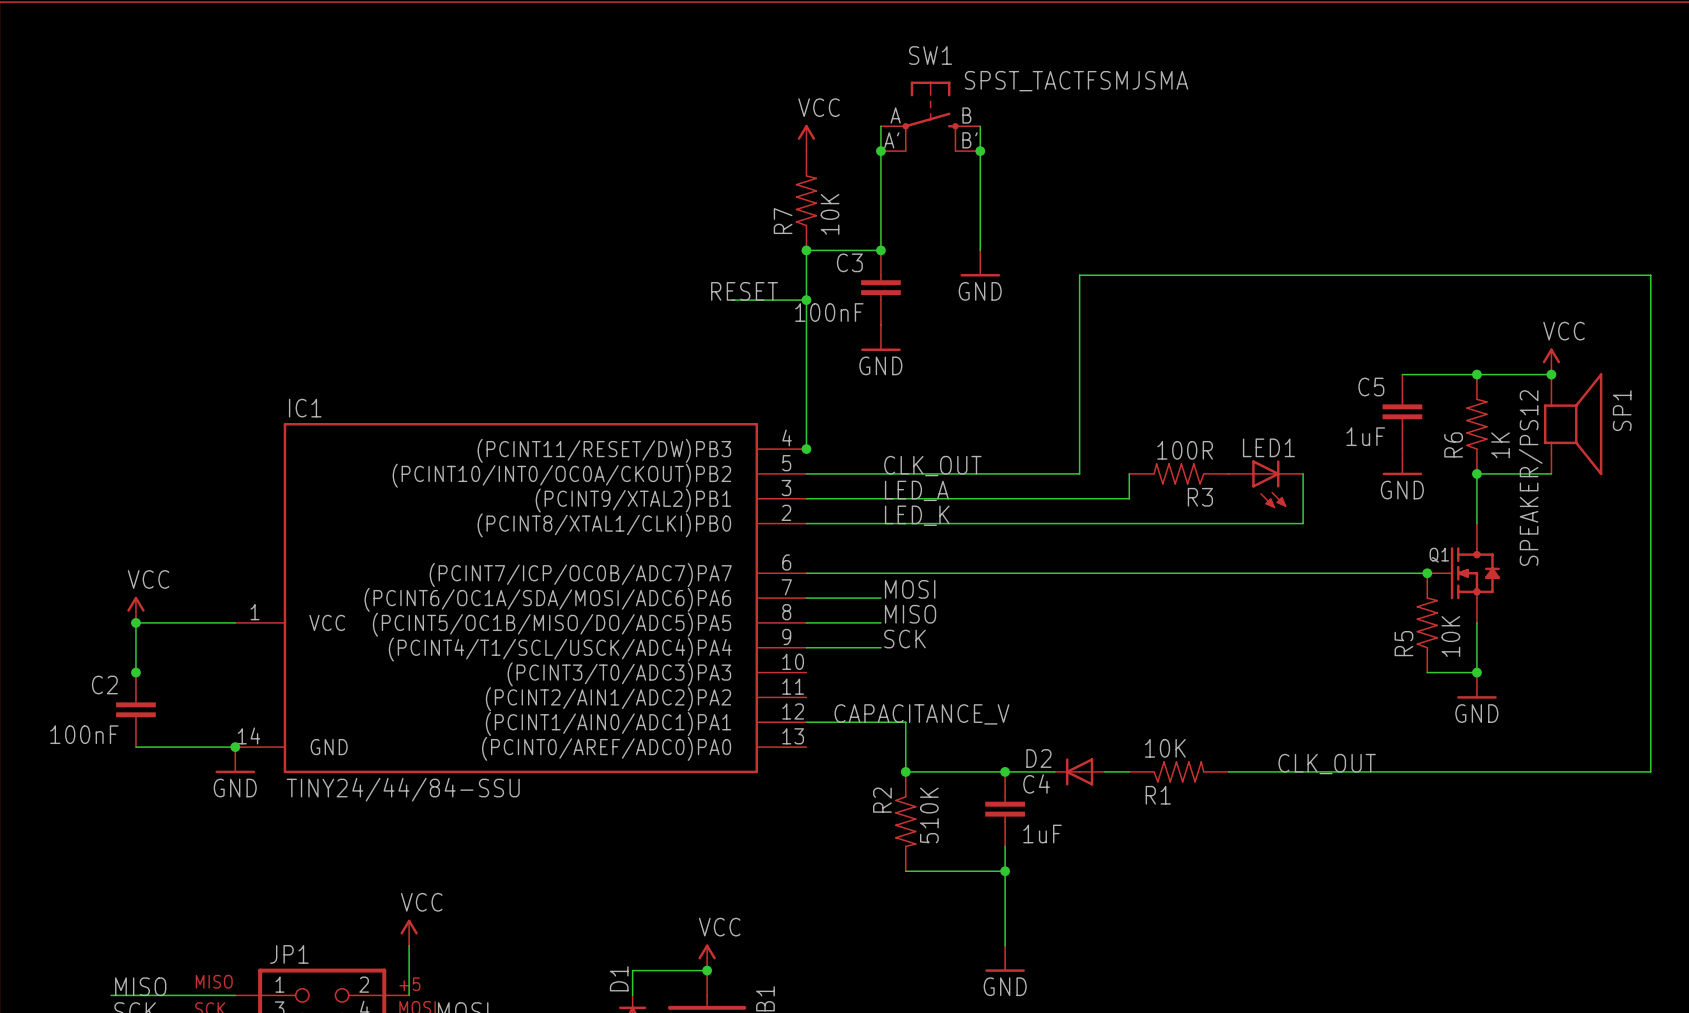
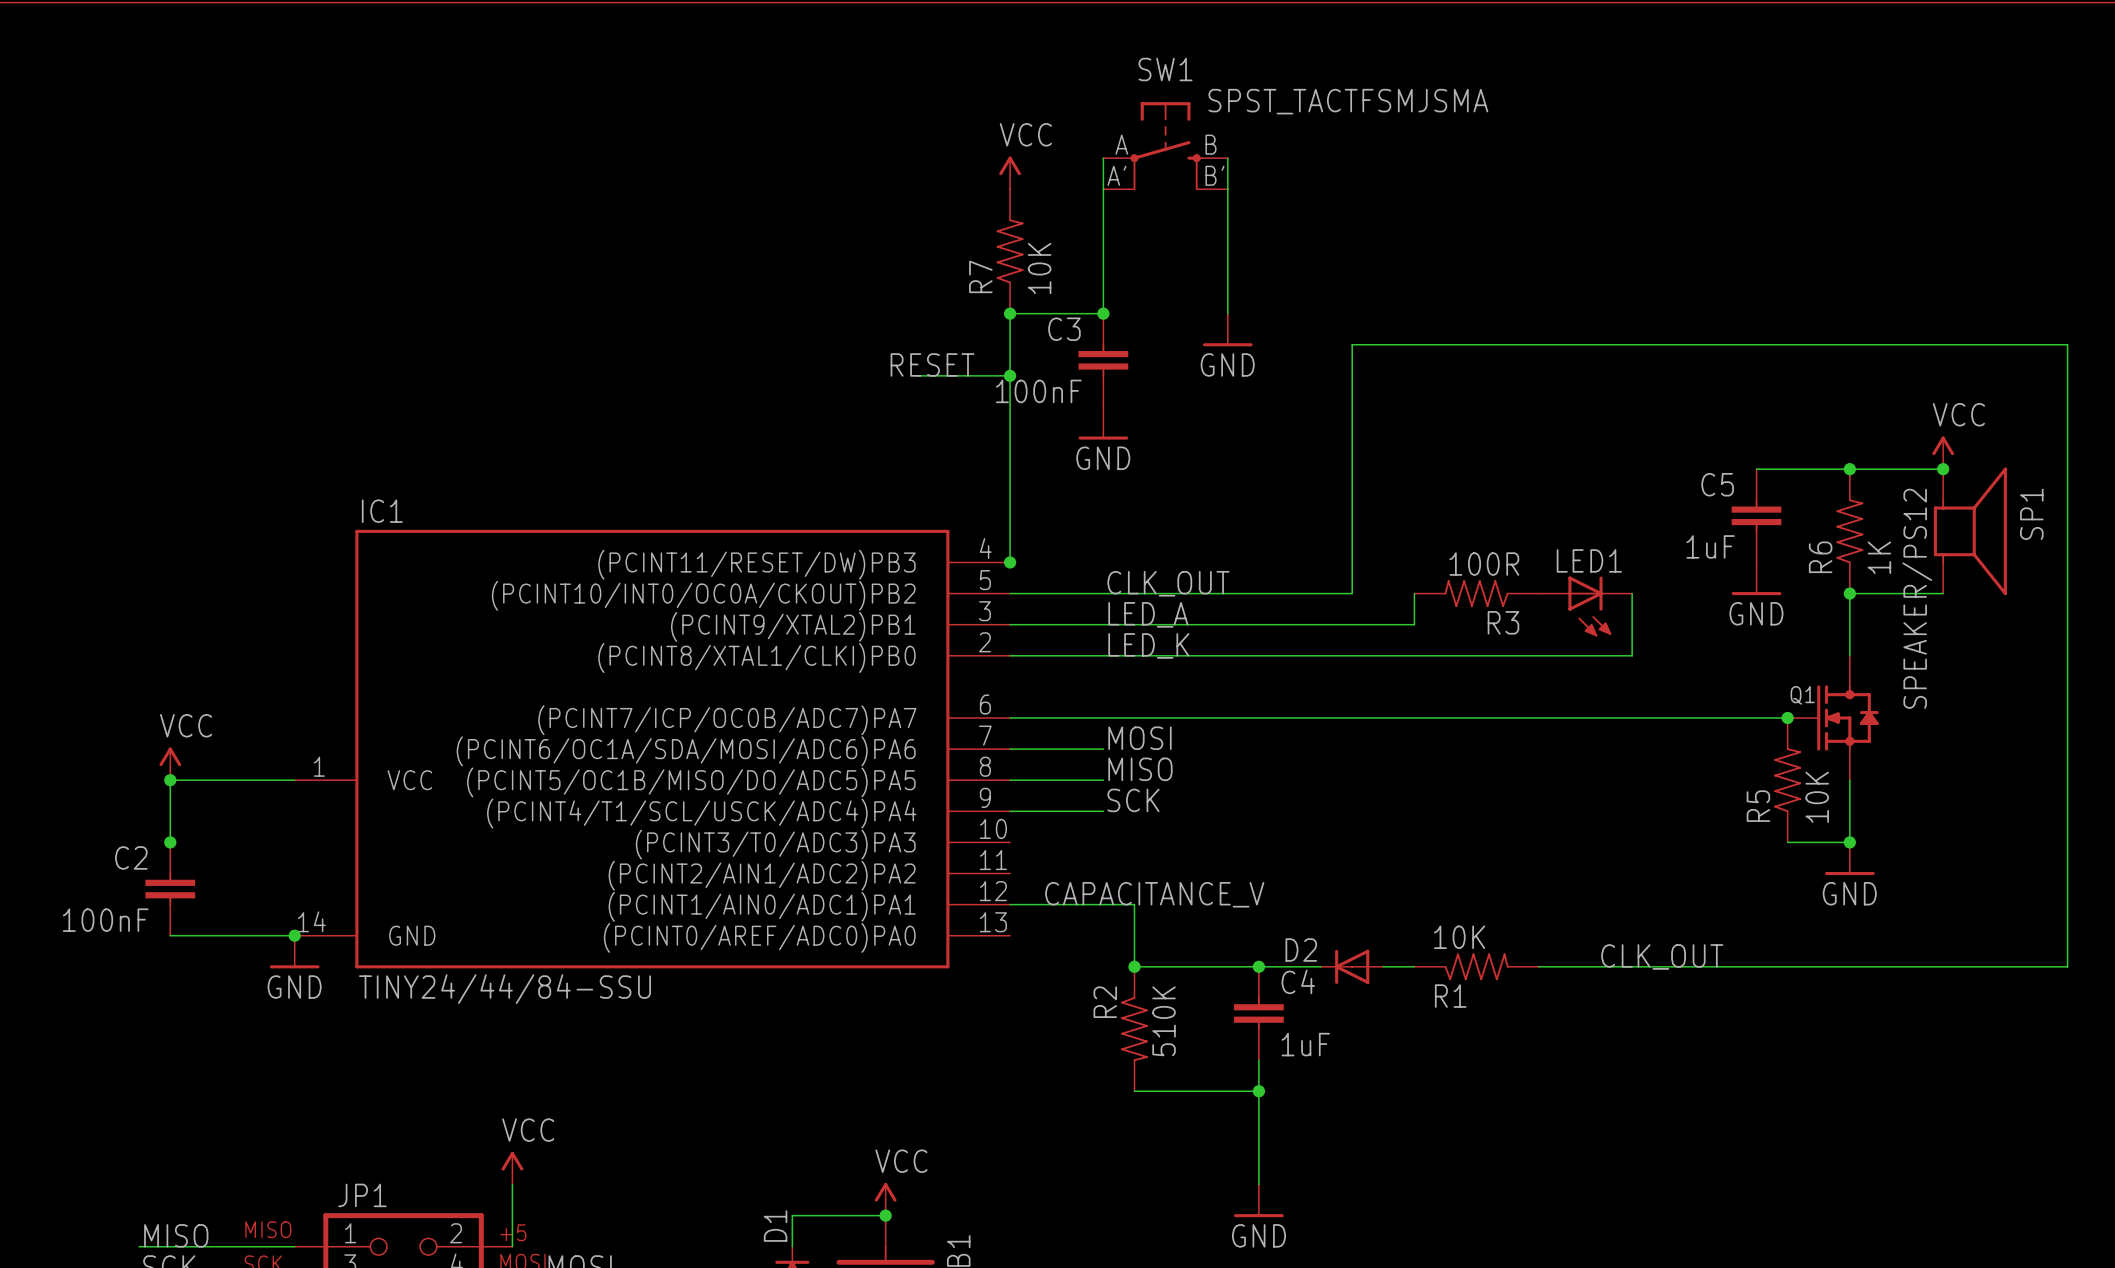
junction: (880, 151) -> none
junction: (980, 151) -> none

